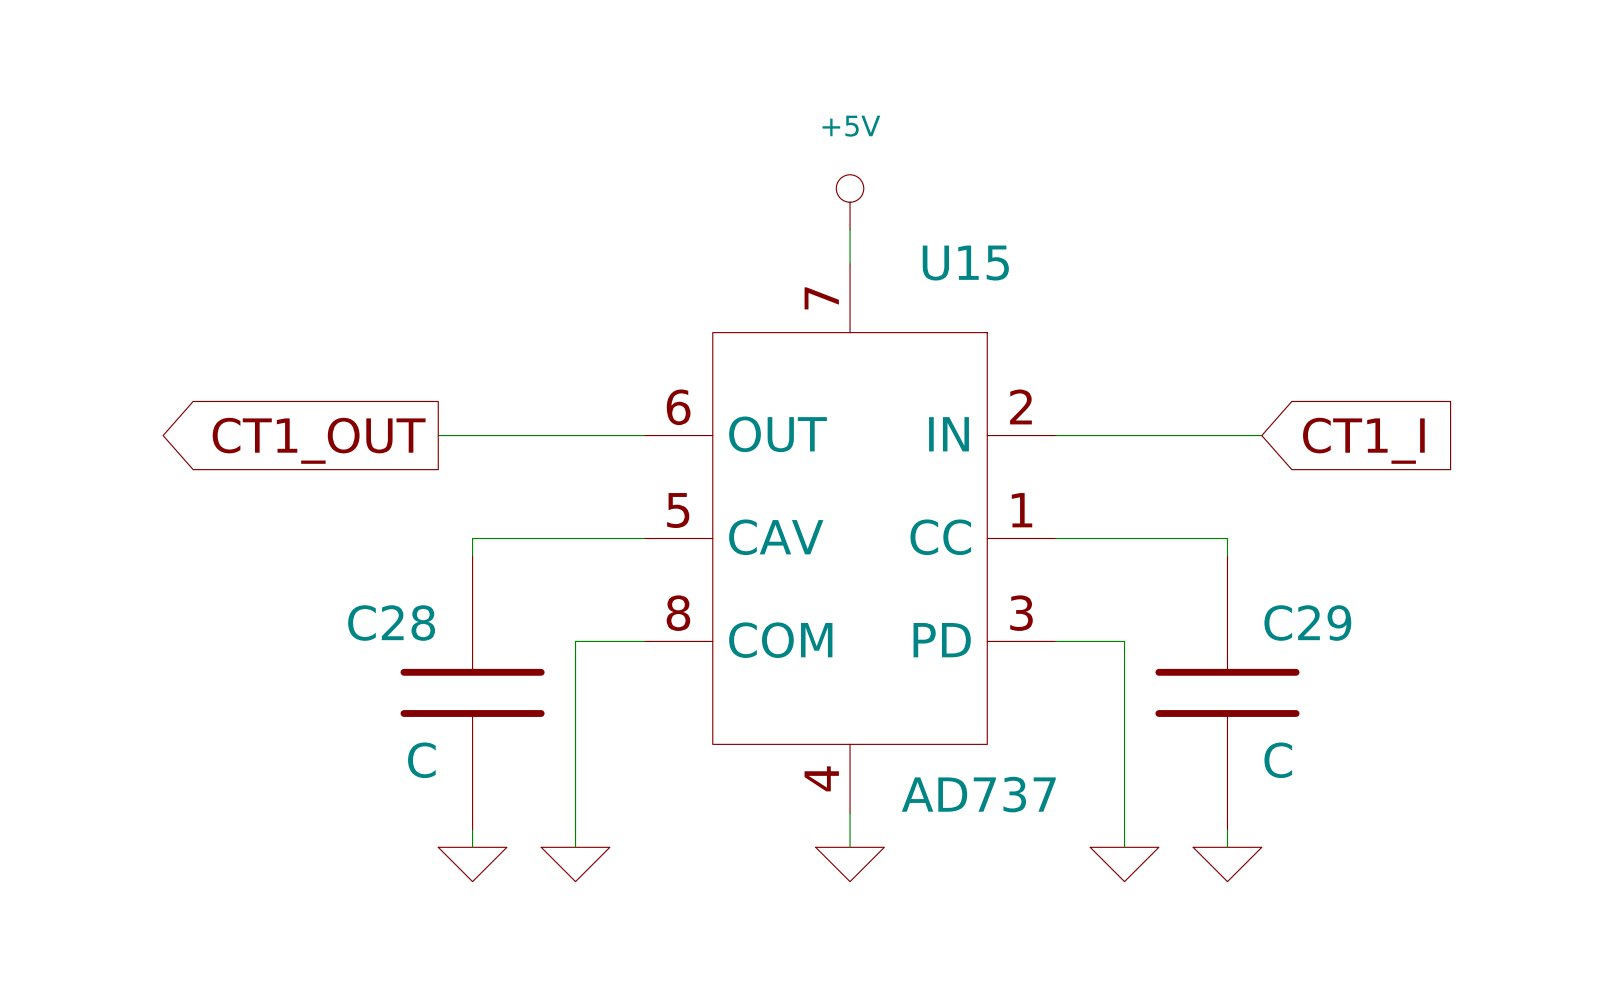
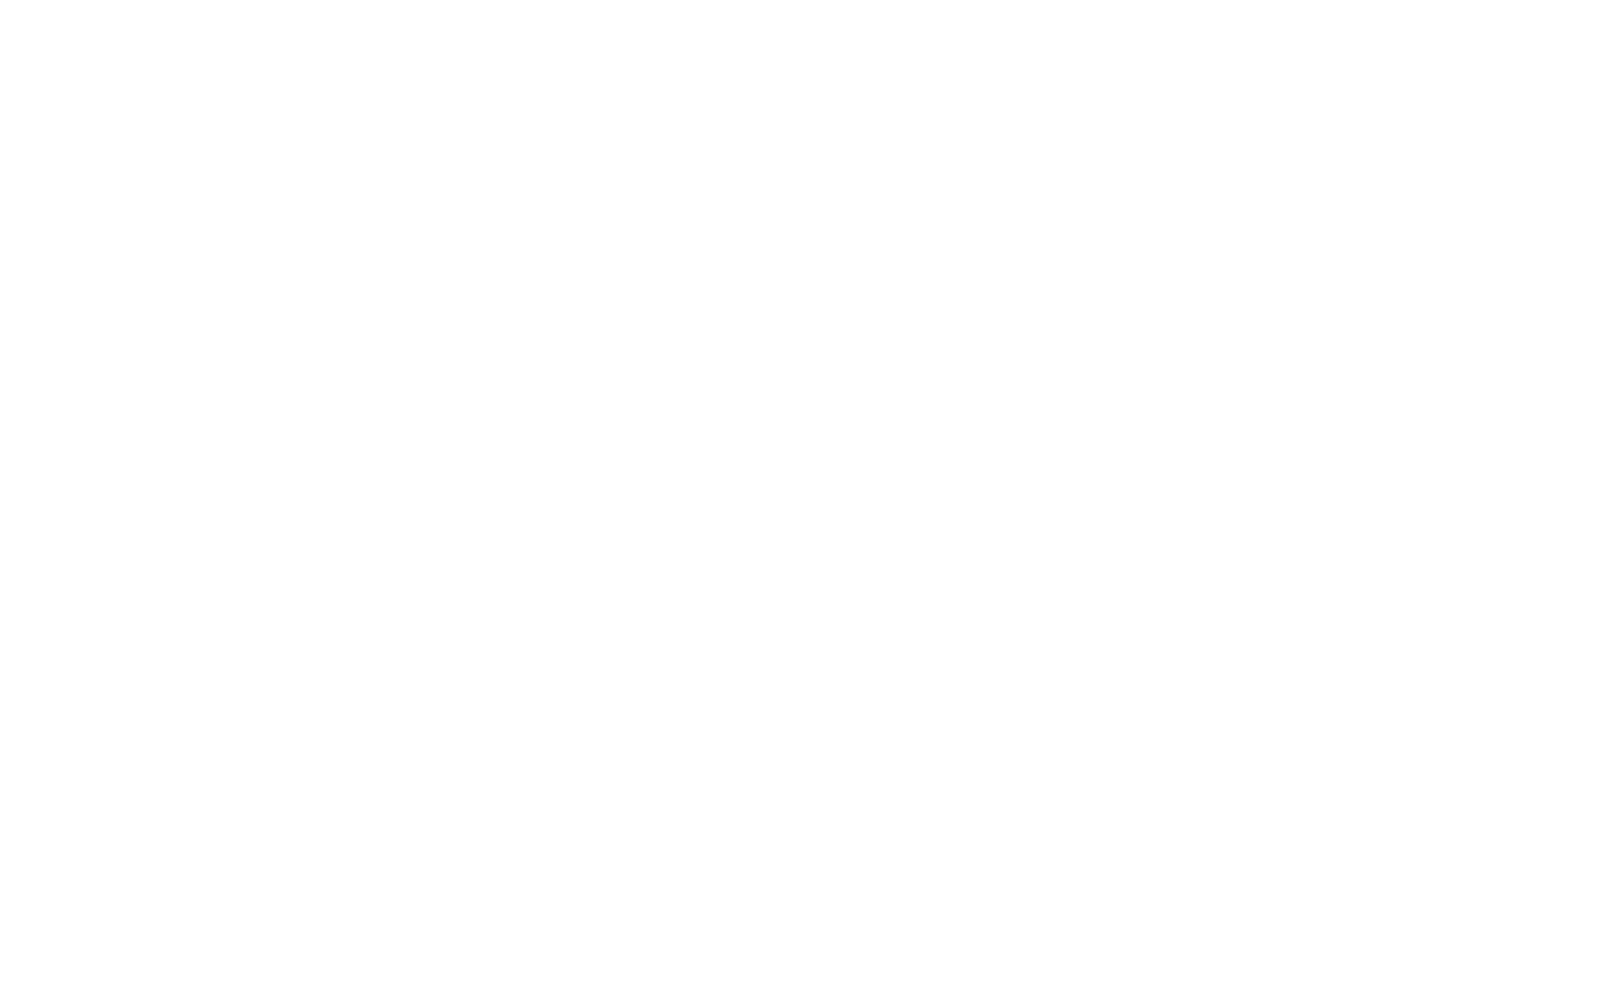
power symbol: +5V (850, 202) -> none
wire: (850, 229) (850, 263) -> none
wire: (438, 435) (644, 435) -> none
wire: (1055, 435) (1261, 435) -> none
global label: CT1_OUT (319, 440) -> none
global label: CT1_I (1363, 440) -> none
wire: (644, 538) (472, 538) (472, 555) -> none
U15: AD737 (850, 538) -> none
wire: (1055, 538) (1227, 538) (1227, 555) -> none
wire: (644, 641) (575, 641) (575, 847) -> none
wire: (1055, 641) (1124, 641) (1124, 847) -> none
C28: C (472, 692) -> none
C29: C (1227, 692) -> none
wire: (850, 813) (850, 847) -> none
wire: (472, 830) (472, 847) -> none
wire: (1227, 830) (1227, 847) -> none
power symbol: (472, 864) -> none
power symbol: (575, 864) -> none
power symbol: (850, 864) -> none
power symbol: (1124, 864) -> none
power symbol: (1227, 864) -> none

